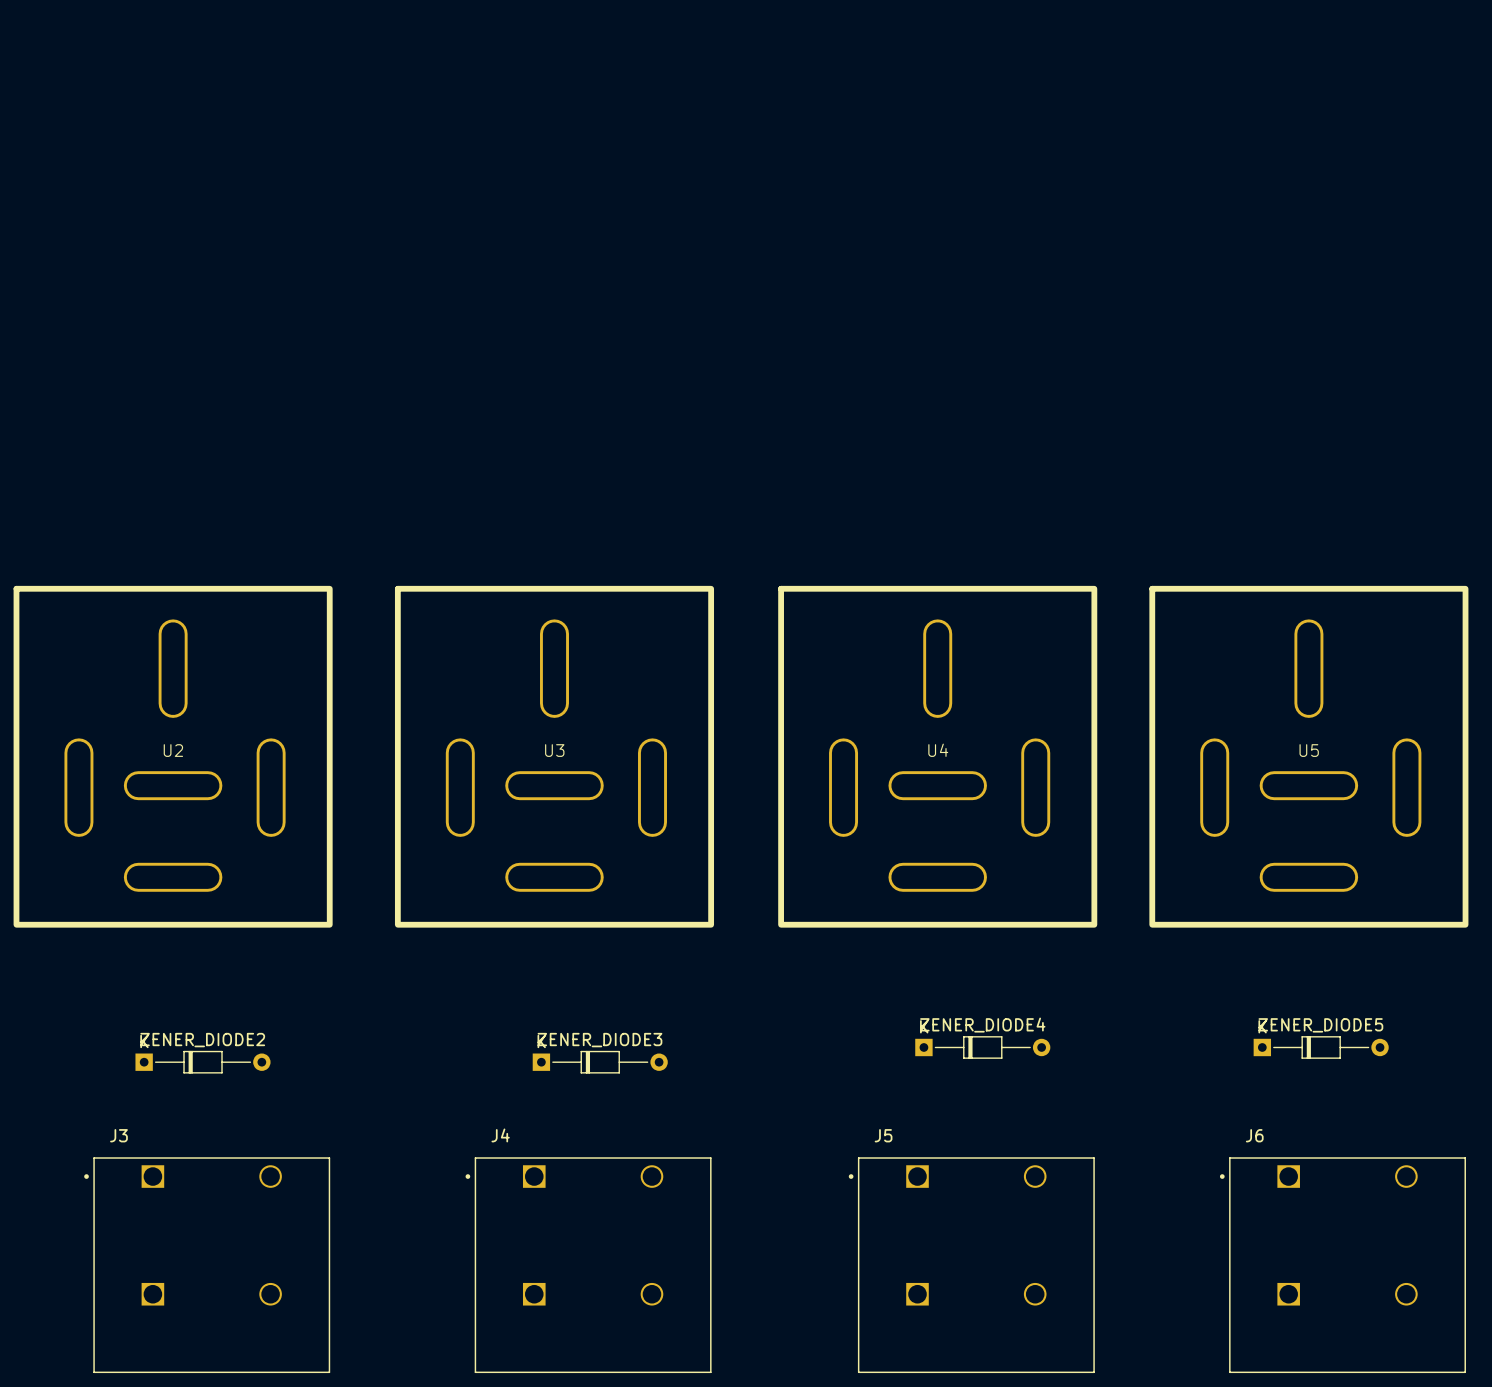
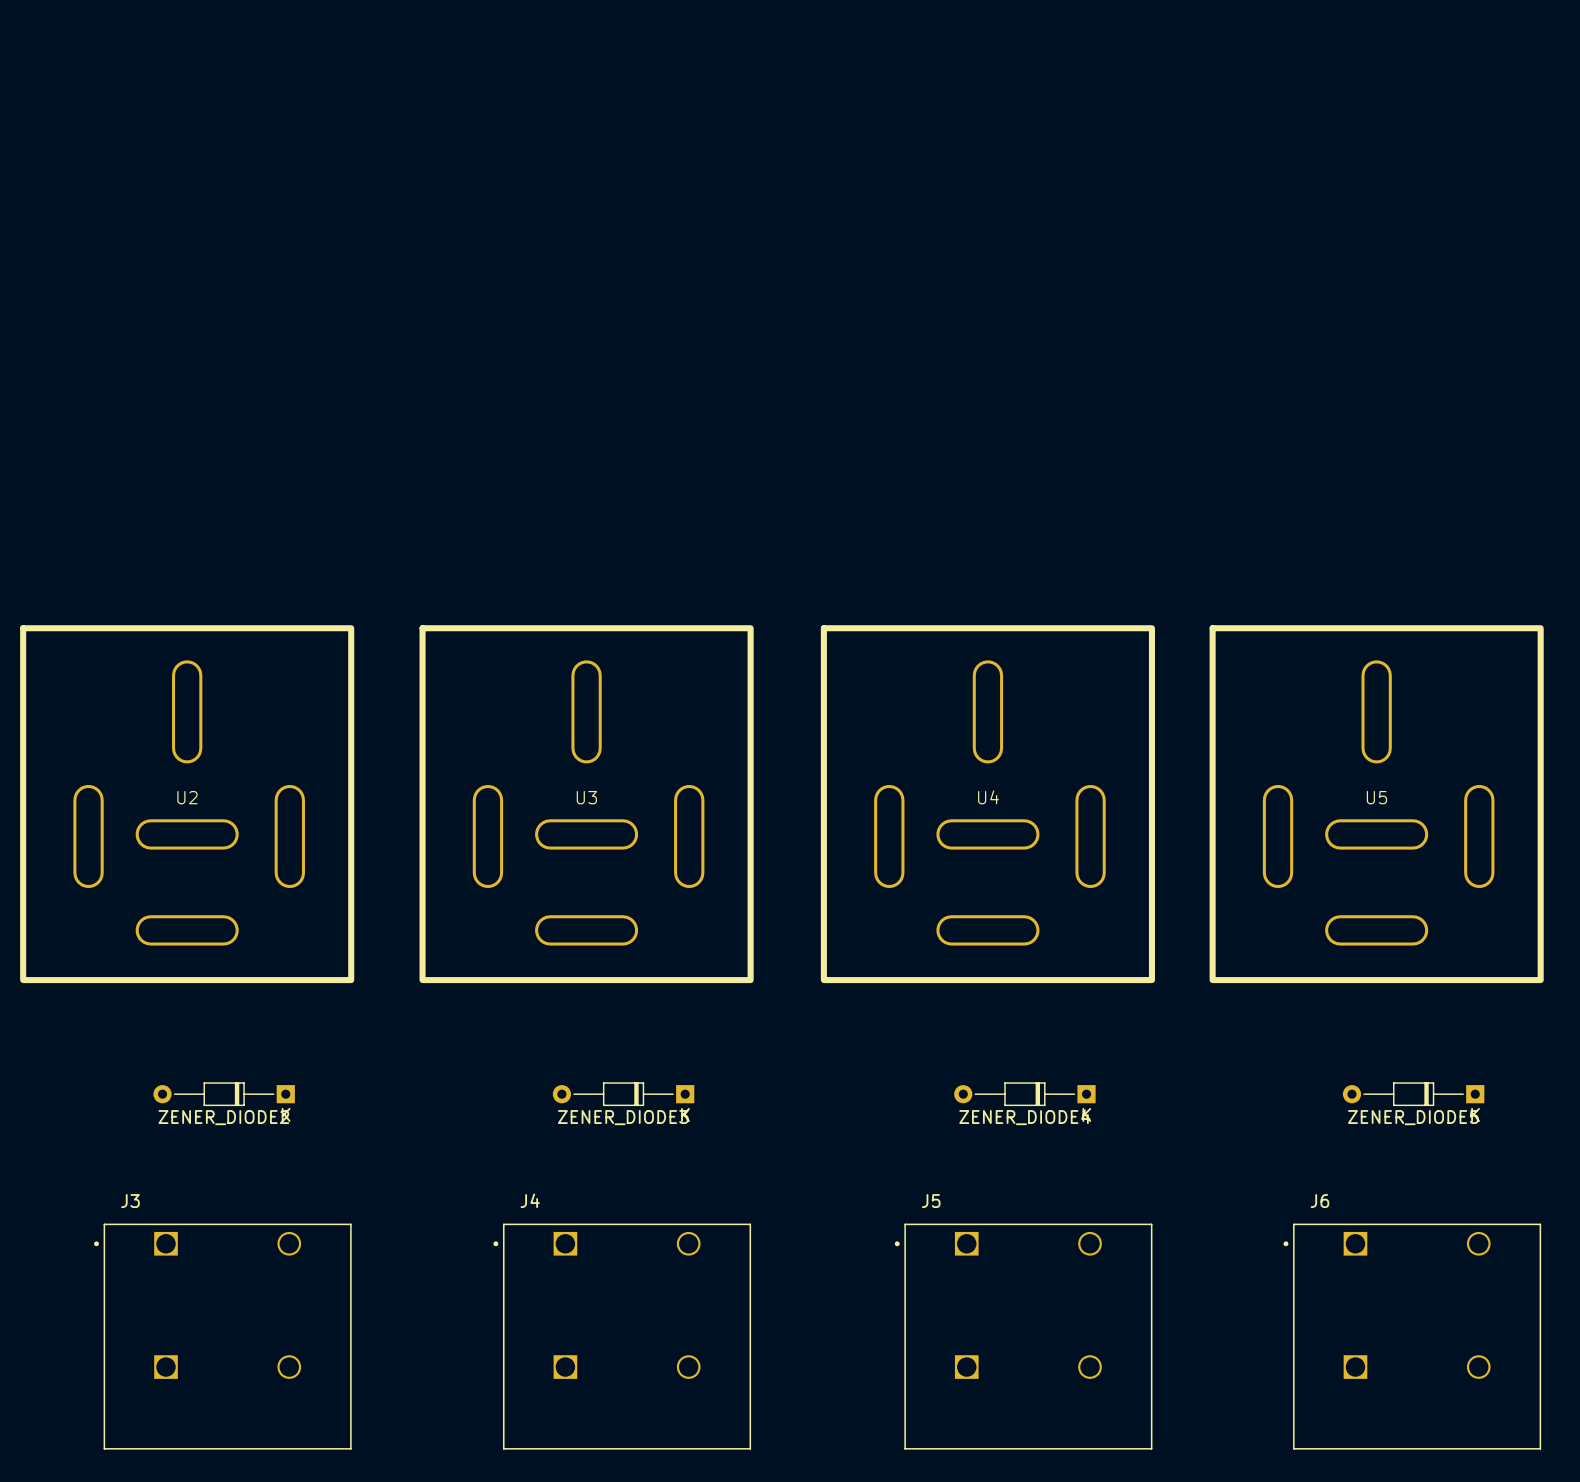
ZENER_DIODE4 rotation: 0° (982, 1047) -> 180° (1024, 1094)
ZENER_DIODE5 rotation: 0° (1321, 1047) -> 180° (1413, 1094)
ZENER_DIODE2 rotation: 0° (203, 1062) -> 180° (224, 1094)
ZENER_DIODE3 rotation: 0° (600, 1062) -> 180° (623, 1094)

